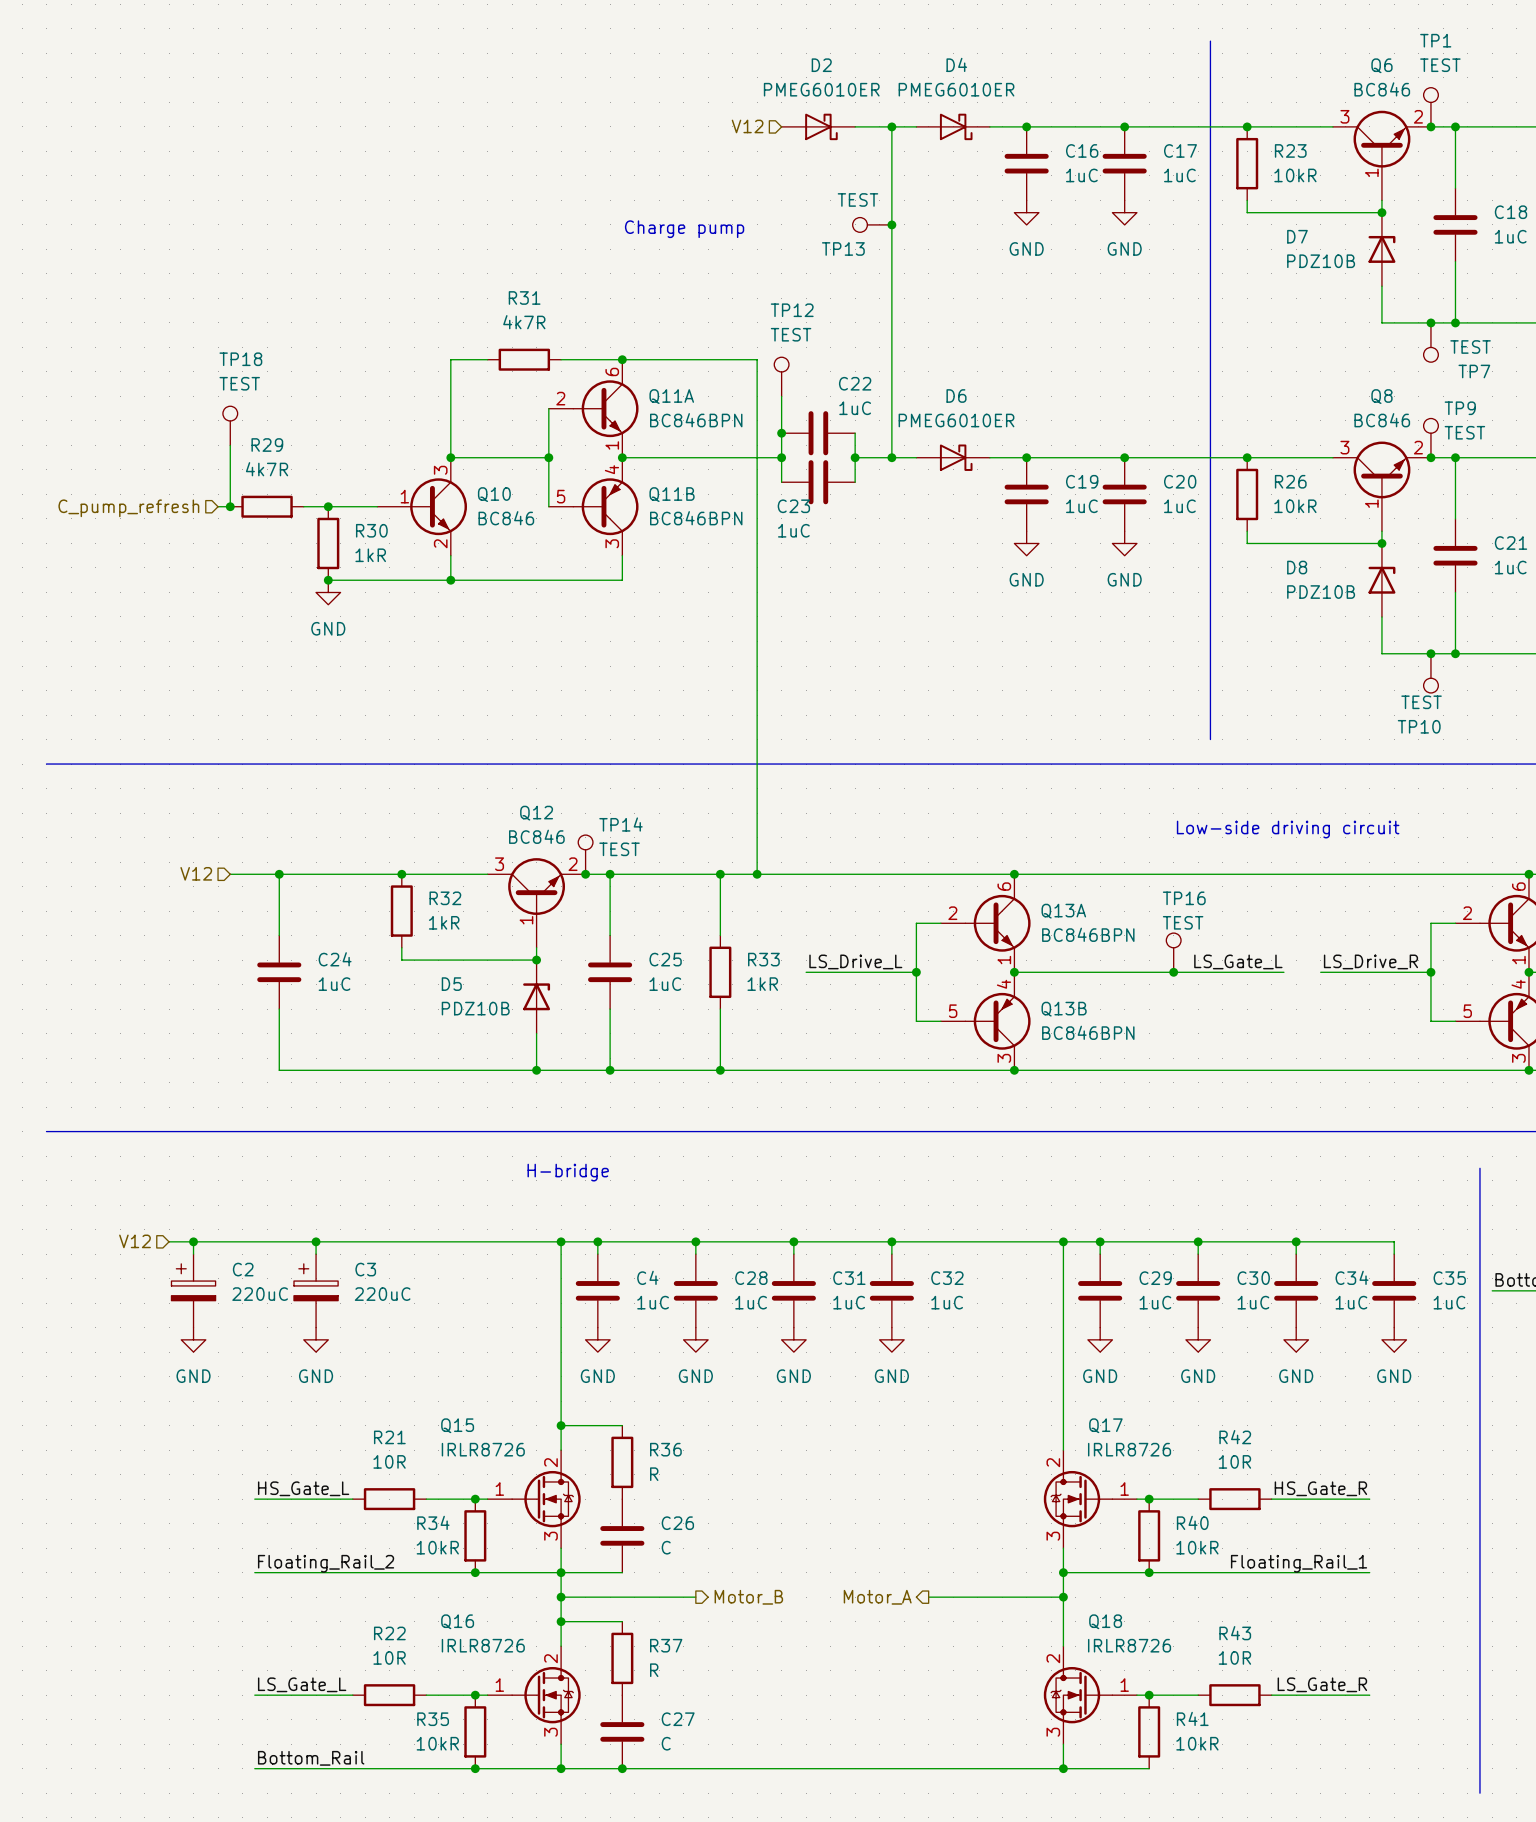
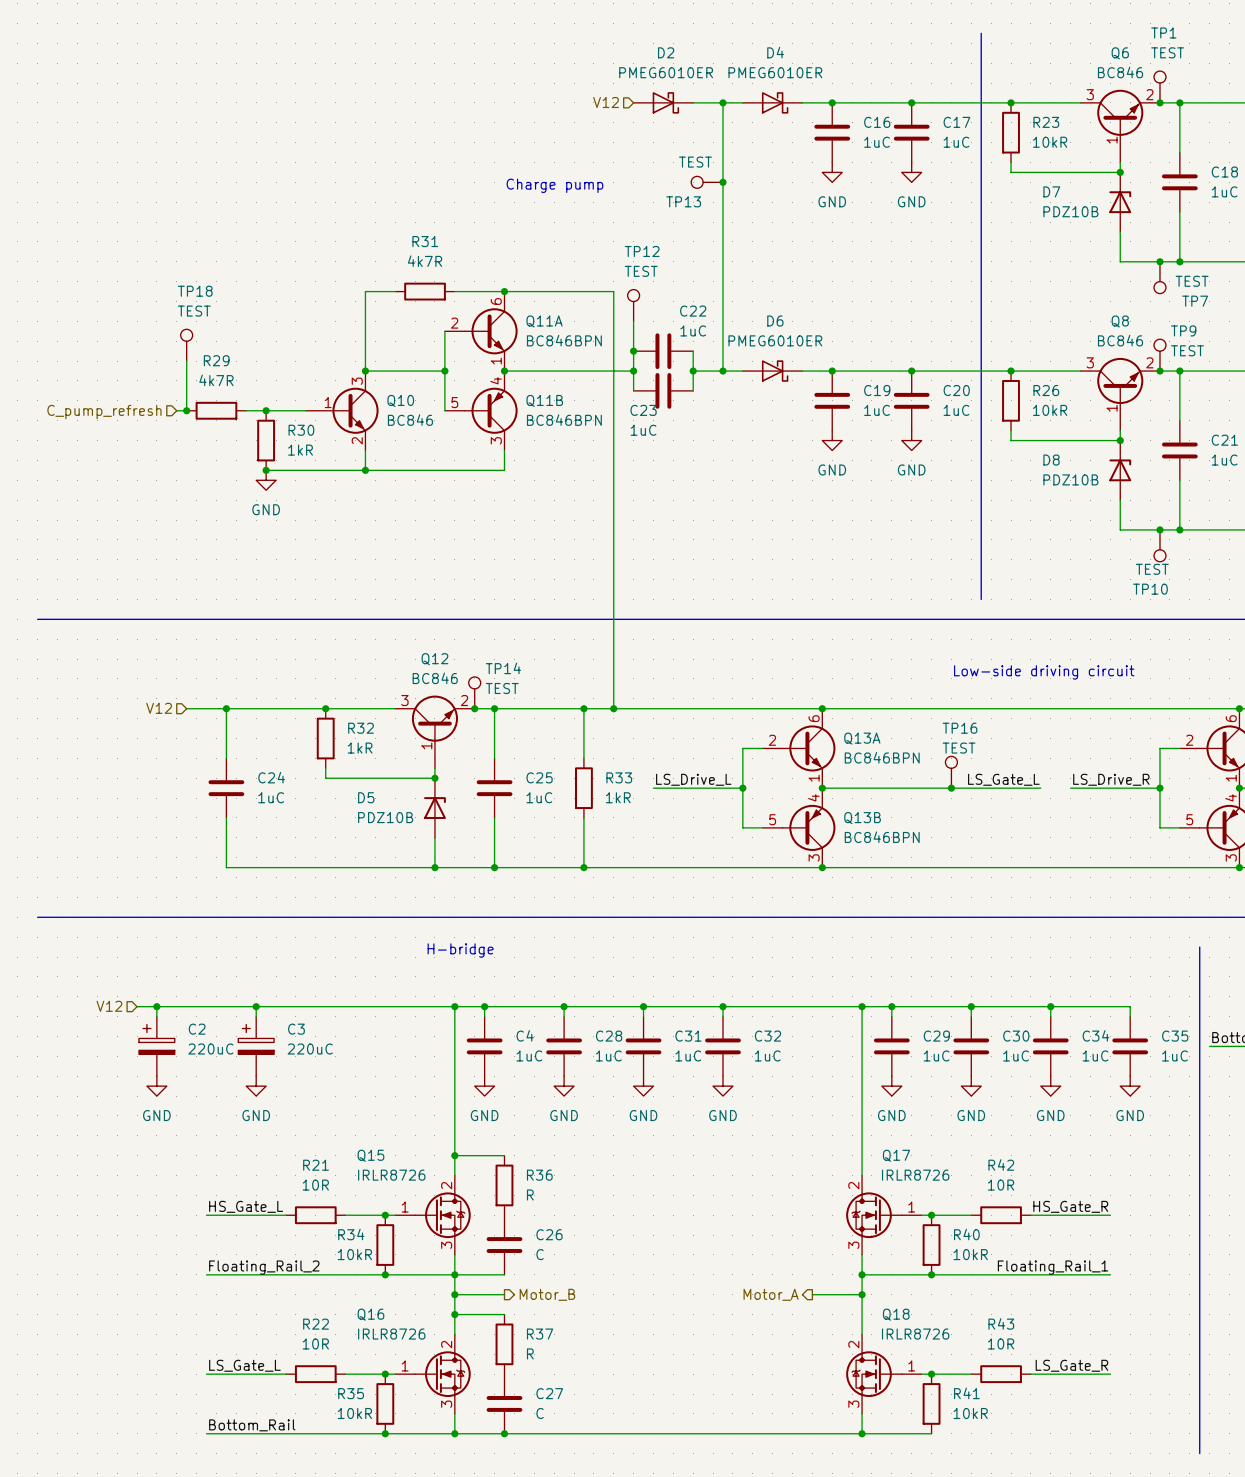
wire: (622, 1597) (695, 1597) -> none
hierarchical label position: Motor_B (748, 1597) -> Motor_B (547, 1294)
hierarchical label position: Motor_A (877, 1597) -> Motor_A (771, 1294)
wire: (928, 1597) (1002, 1597) -> none

